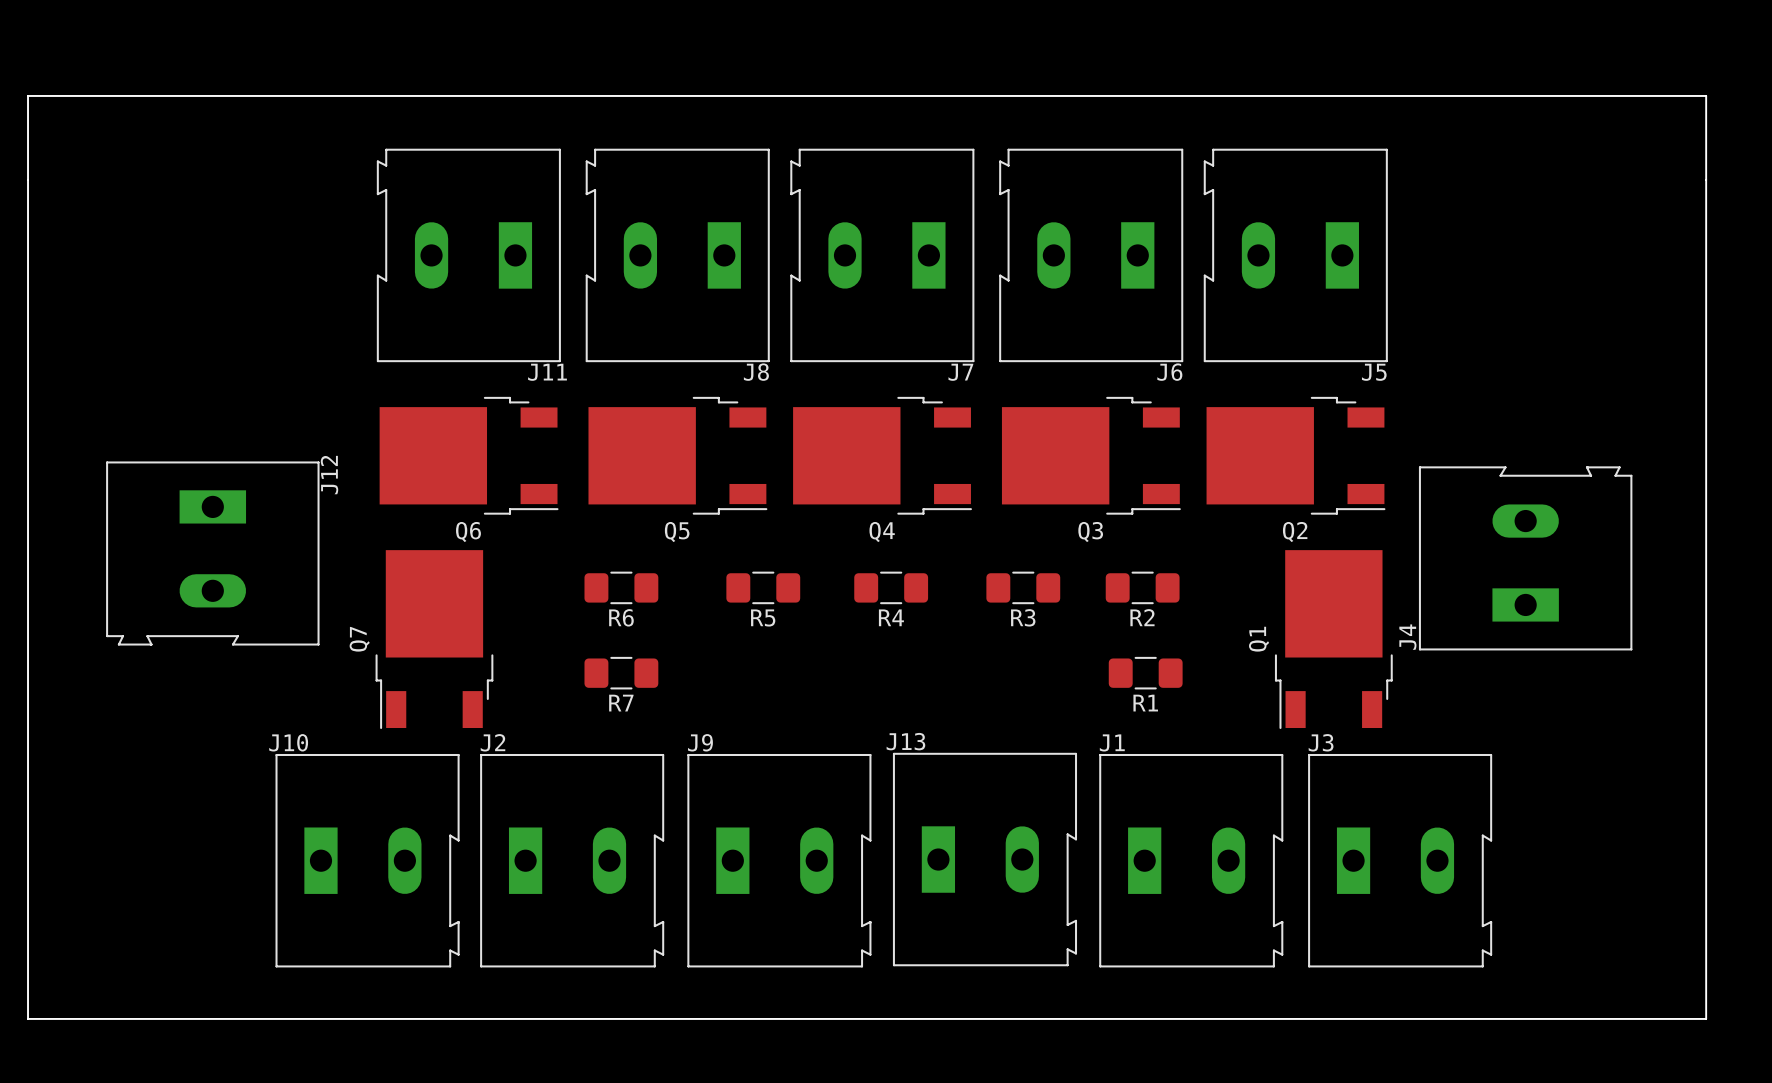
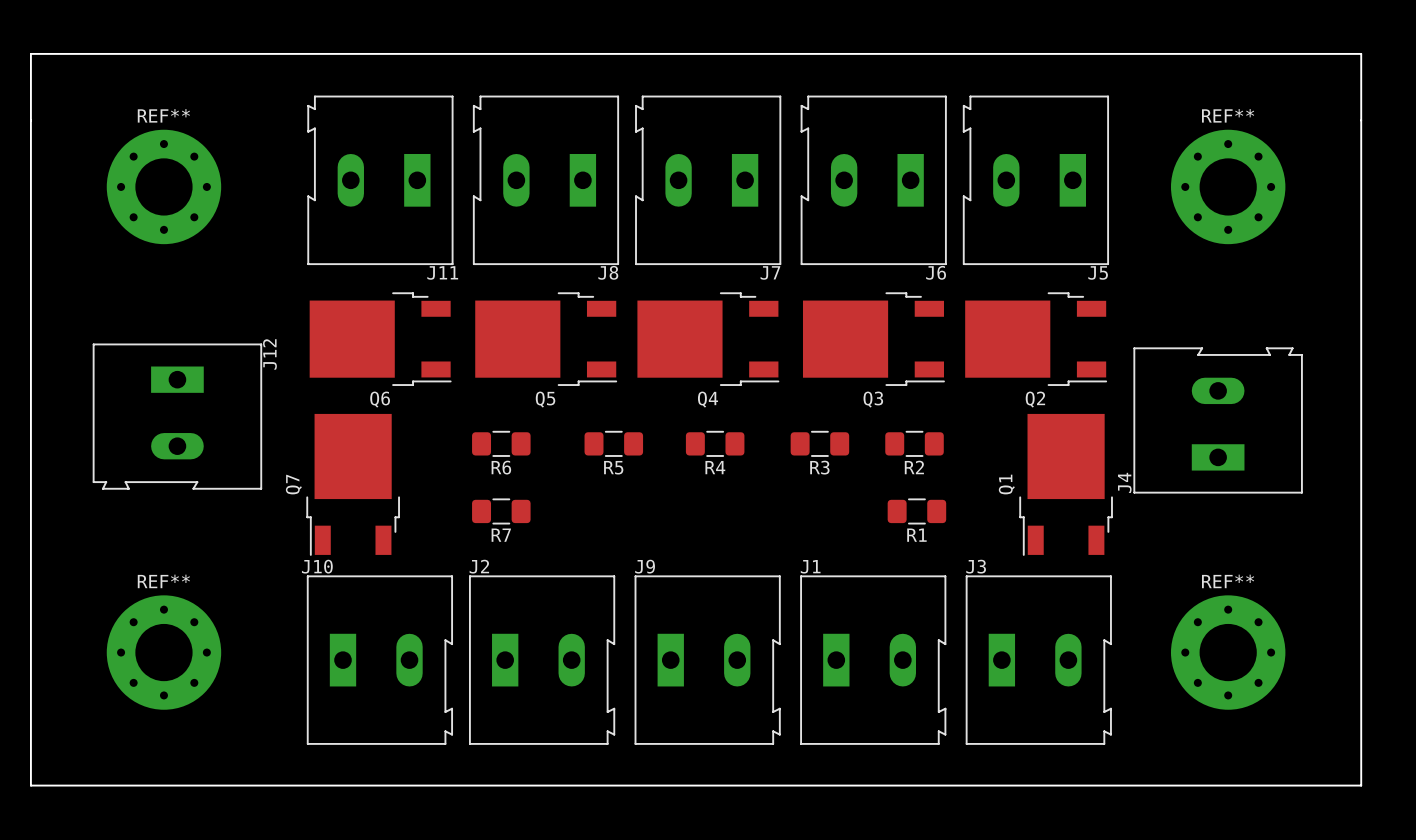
REF**: none -> (163, 186)
REF**: none -> (1228, 186)
REF**: none -> (163, 652)
REF**: none -> (1228, 652)
J13: (984, 859) -> none
J10 position: (367, 860) -> (379, 660)
J2 position: (572, 860) -> (542, 660)
J9 position: (779, 860) -> (707, 660)
J1 position: (1191, 860) -> (873, 660)
J3 position: (1400, 860) -> (1038, 660)

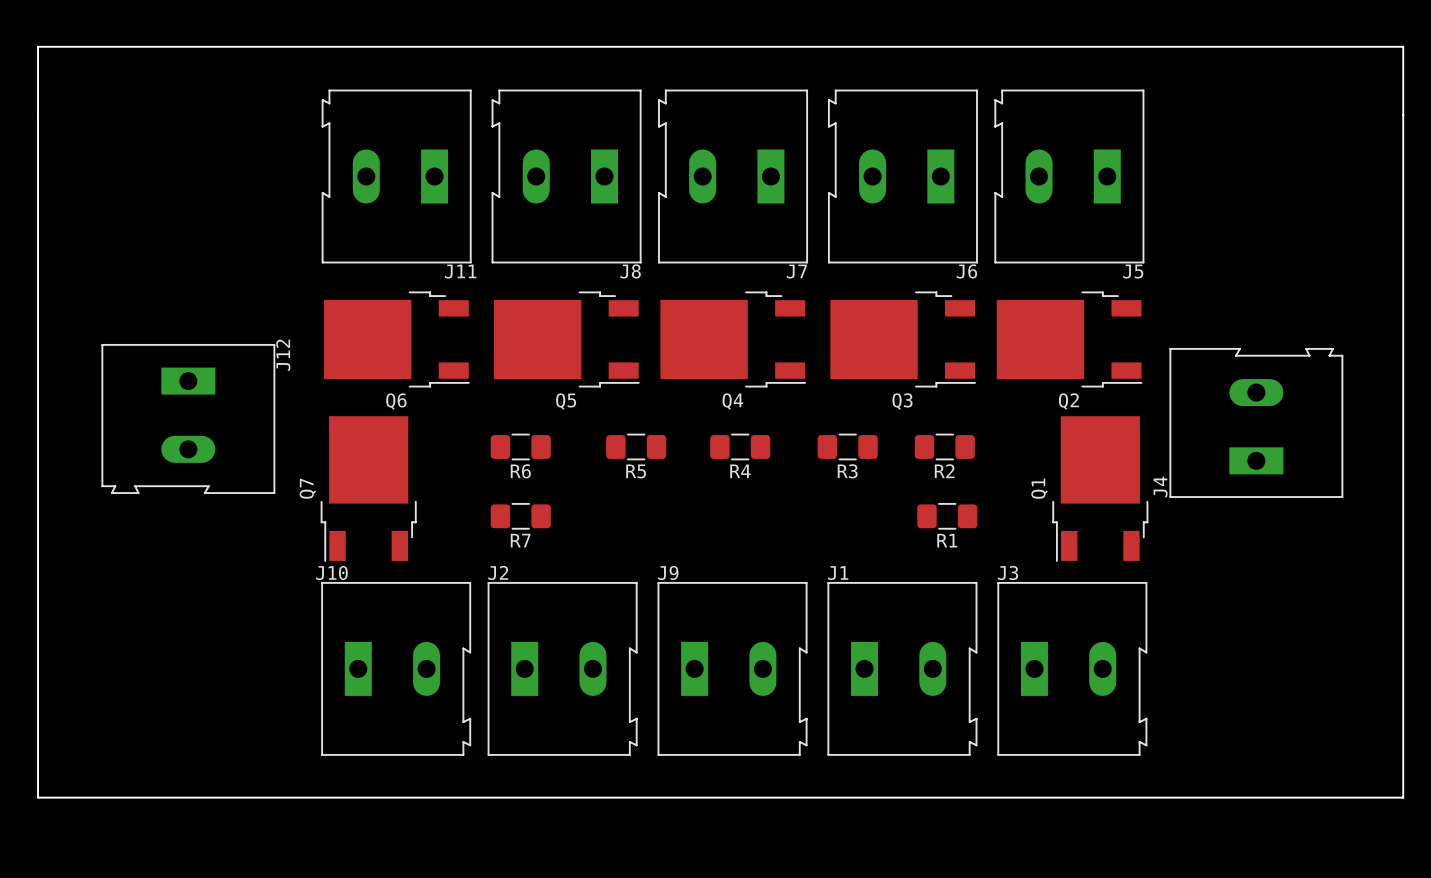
REF**: (163, 186) -> none
REF**: (1228, 186) -> none
REF**: (163, 652) -> none
REF**: (1228, 652) -> none

